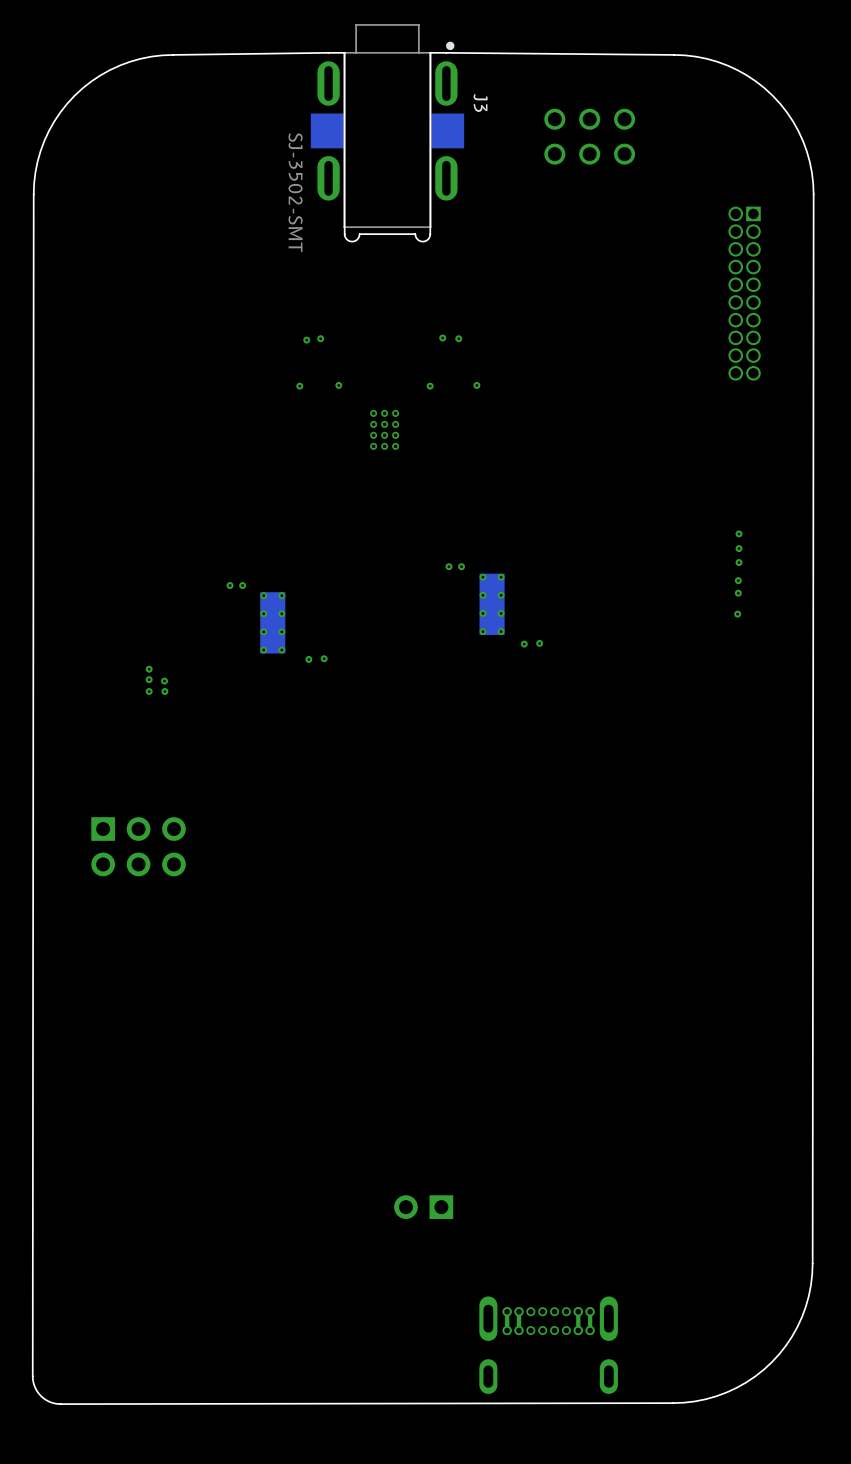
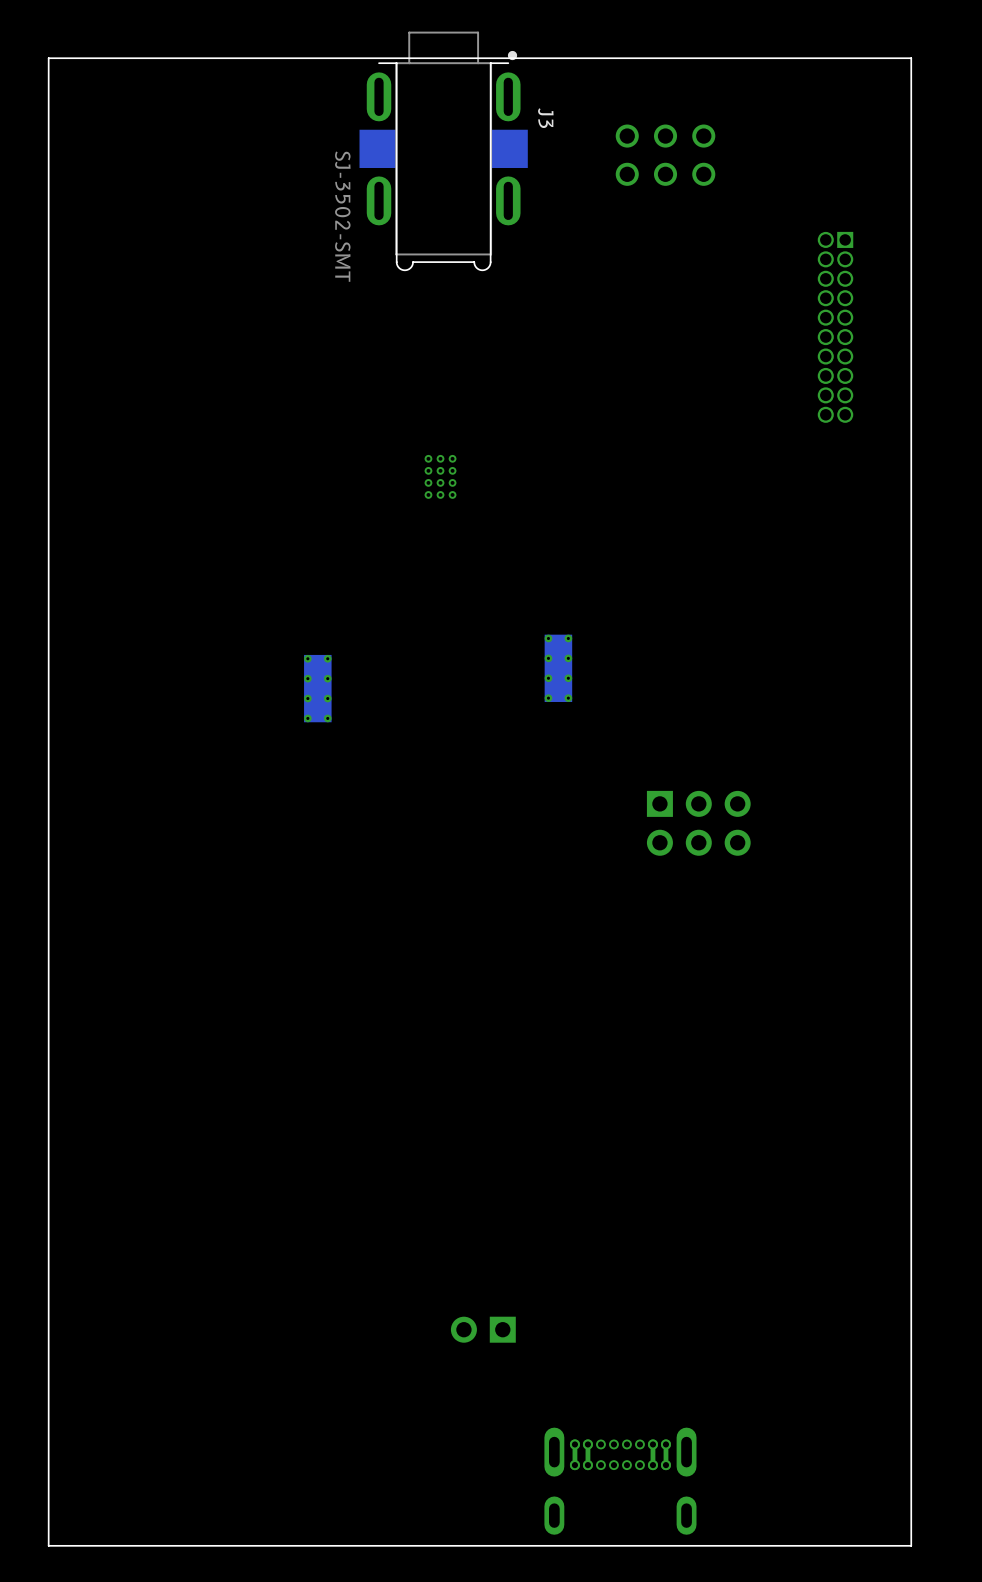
board edge: none -> (911, 58) (48, 58) (48, 1545) (911, 1545) (911, 58)
board edge: (446, 52) (674, 54) (706, 58) (727, 65) (747, 75) (772, 95) (793, 121) (806, 151) (811, 172) (813, 194) (812, 1263) (810, 1285) (805, 1306) (792, 1336) (779, 1354) (763, 1369) (736, 1387) (716, 1396) (695, 1401) (673, 1403) (54, 1403) (45, 1399) (38, 1393) (34, 1385) (32, 1376) (33, 194) (37, 161) (48, 131) (67, 103) (91, 81) (119, 65) (140, 58) (162, 55) (328, 52) -> none
part: (320, 338) -> none
part: (442, 338) -> none
part: (458, 338) -> none
part: (306, 340) -> none
part: (338, 385) -> none
part: (476, 385) -> none
part: (299, 386) -> none
part: (430, 386) -> none
part: (739, 533) -> none
part: (739, 548) -> none
part: (739, 562) -> none
part: (448, 566) -> none
part: (461, 566) -> none
part: (738, 580) -> none
part: (230, 585) -> none
part: (242, 585) -> none
part: (738, 593) -> none
part: (737, 614) -> none
part: (539, 643) -> none
part: (524, 644) -> none
part: (324, 658) -> none
part: (308, 659) -> none
part: (149, 669) -> none
part: (149, 679) -> none
part: (164, 681) -> none
part: (149, 691) -> none
part: (164, 691) -> none
part: none -> (698, 823)
part: (138, 846) -> none

